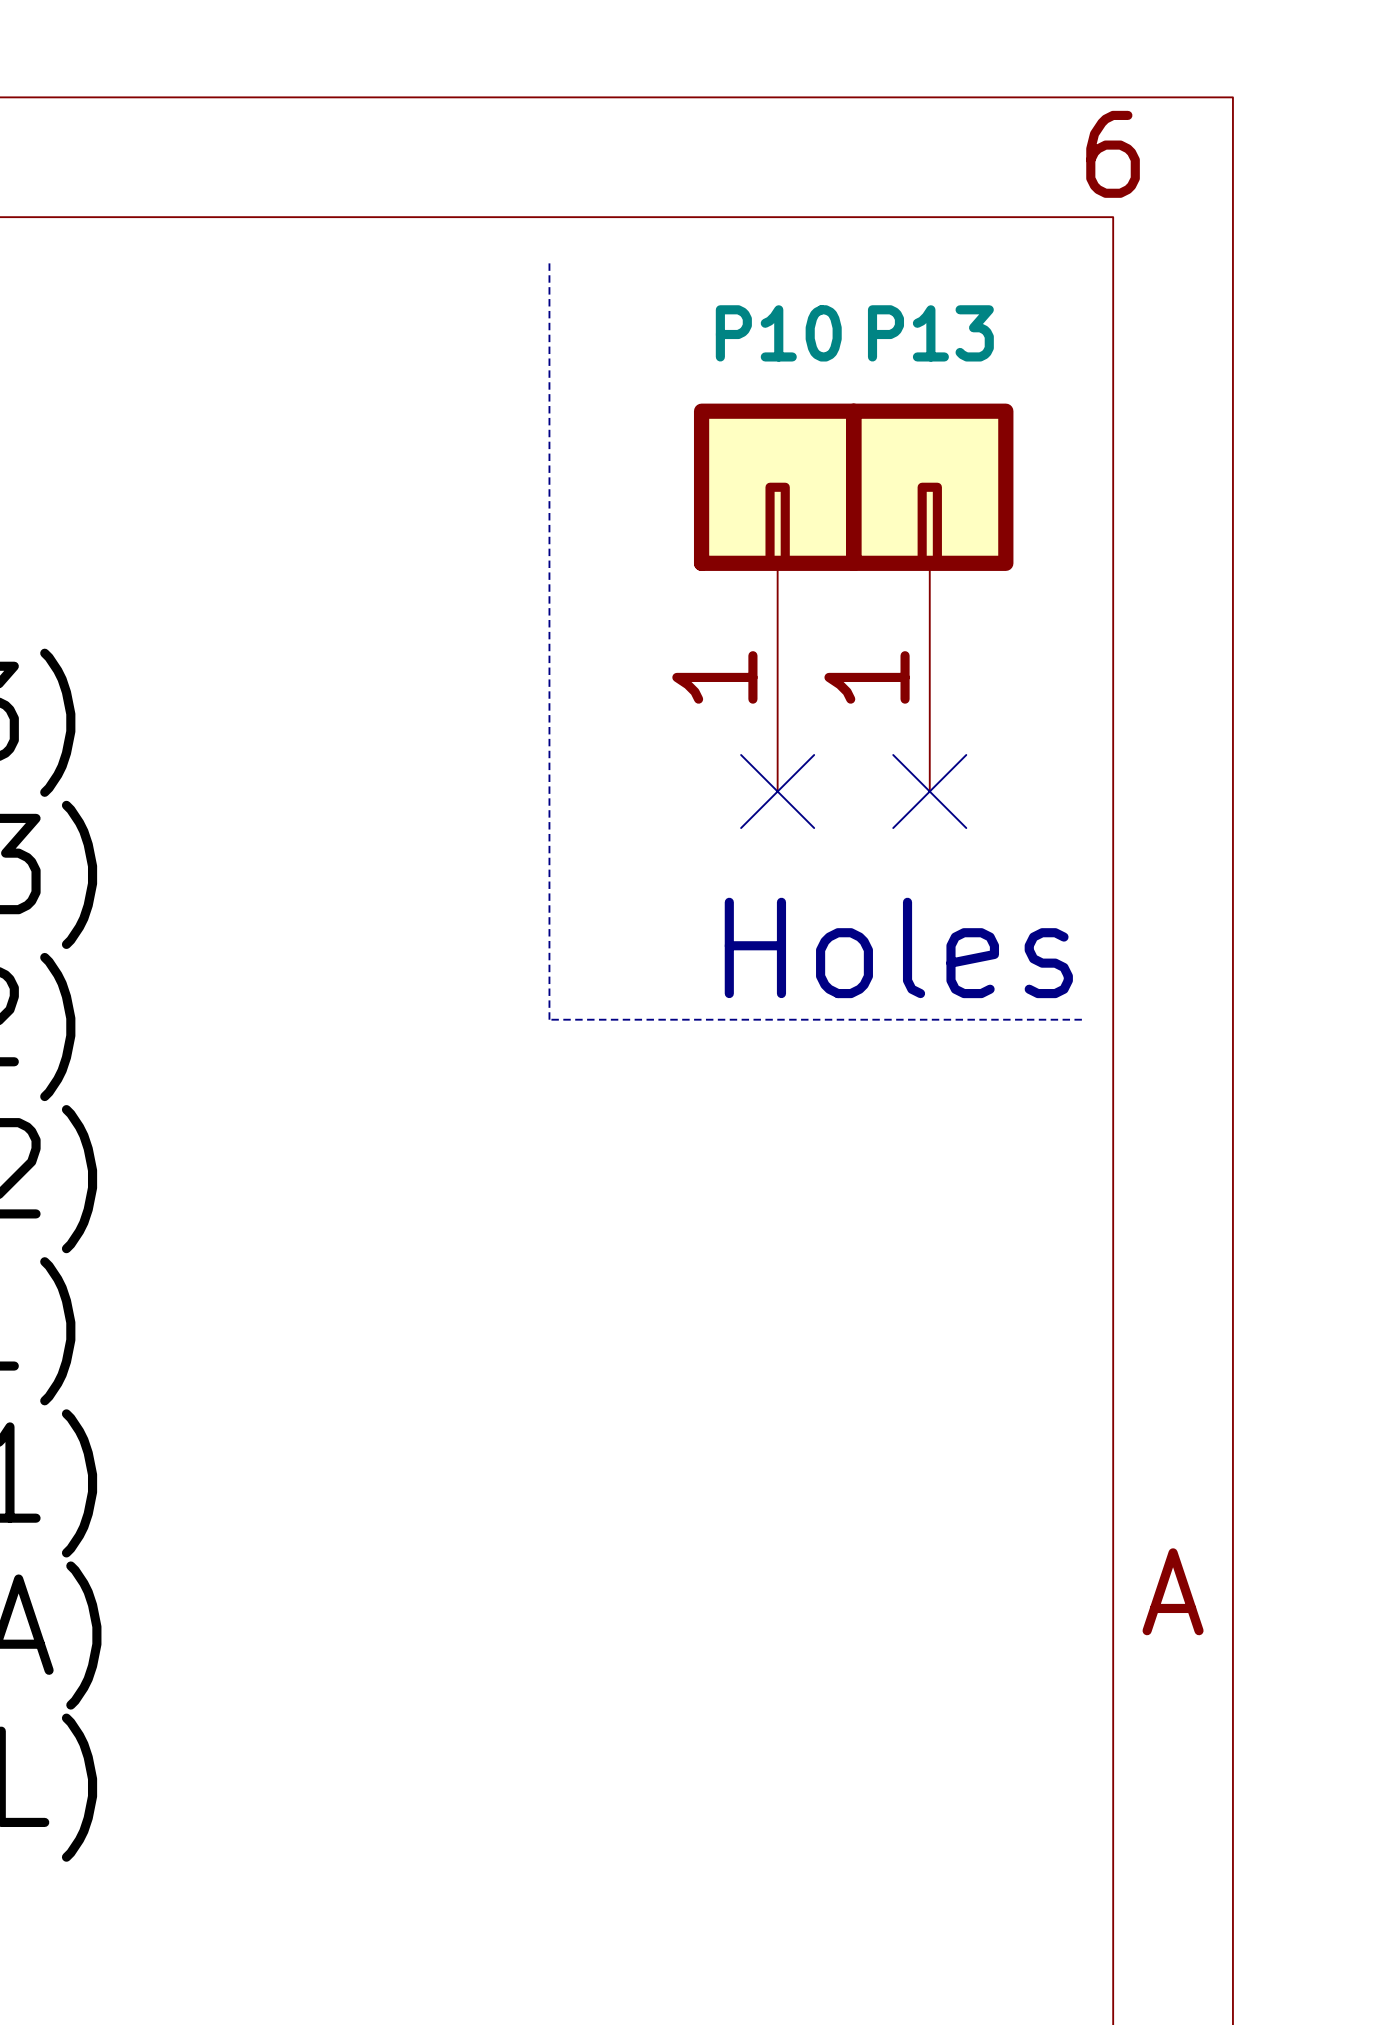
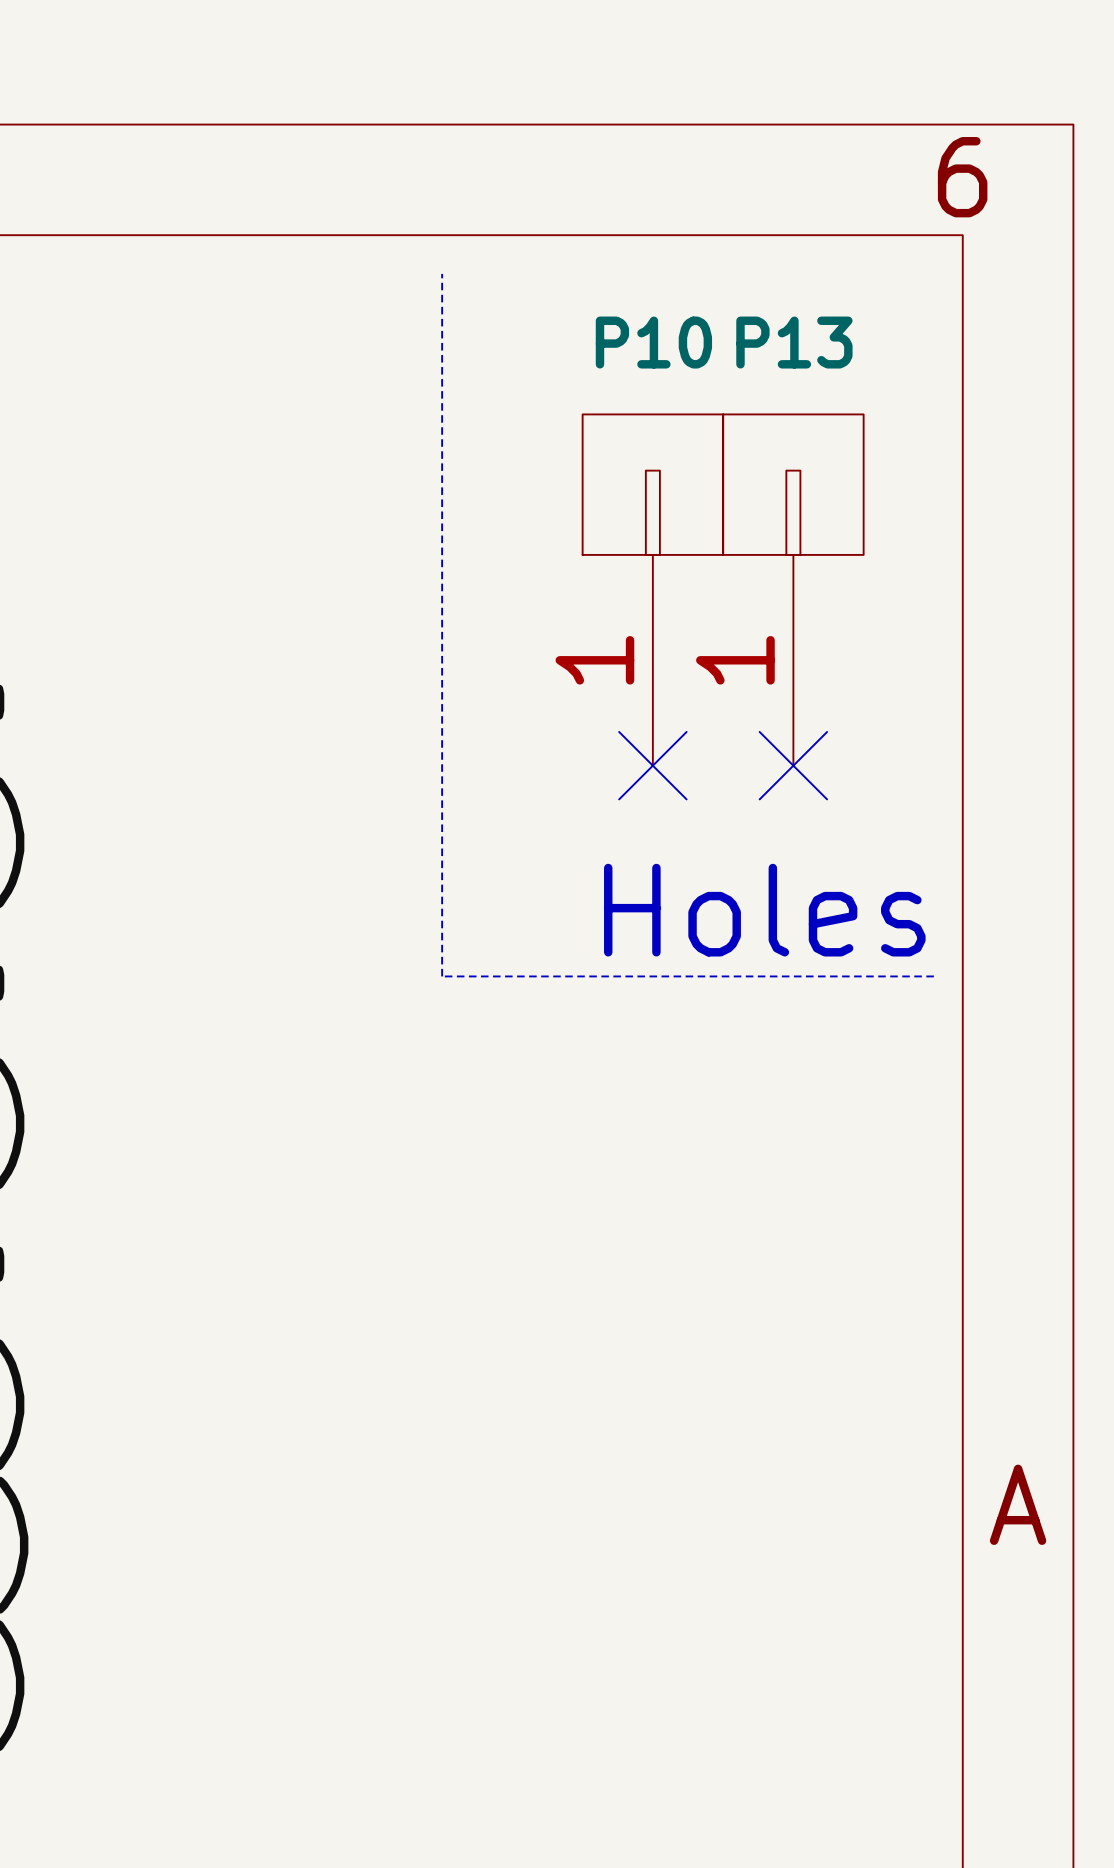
P10 symbol: [693, 403, 862, 792] -> [582, 414, 724, 766]
P13 symbol: [846, 403, 1014, 792] -> [723, 414, 864, 766]

